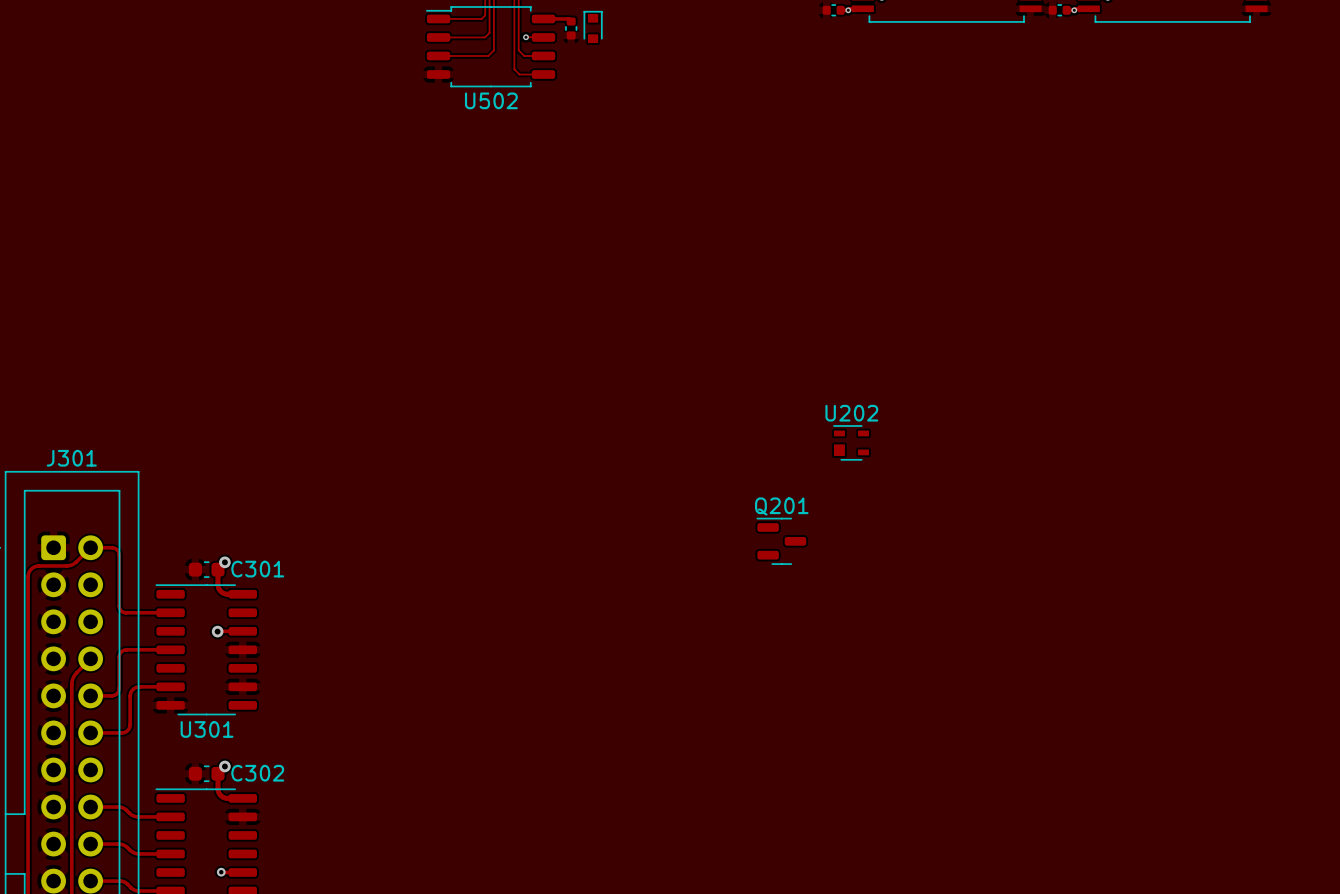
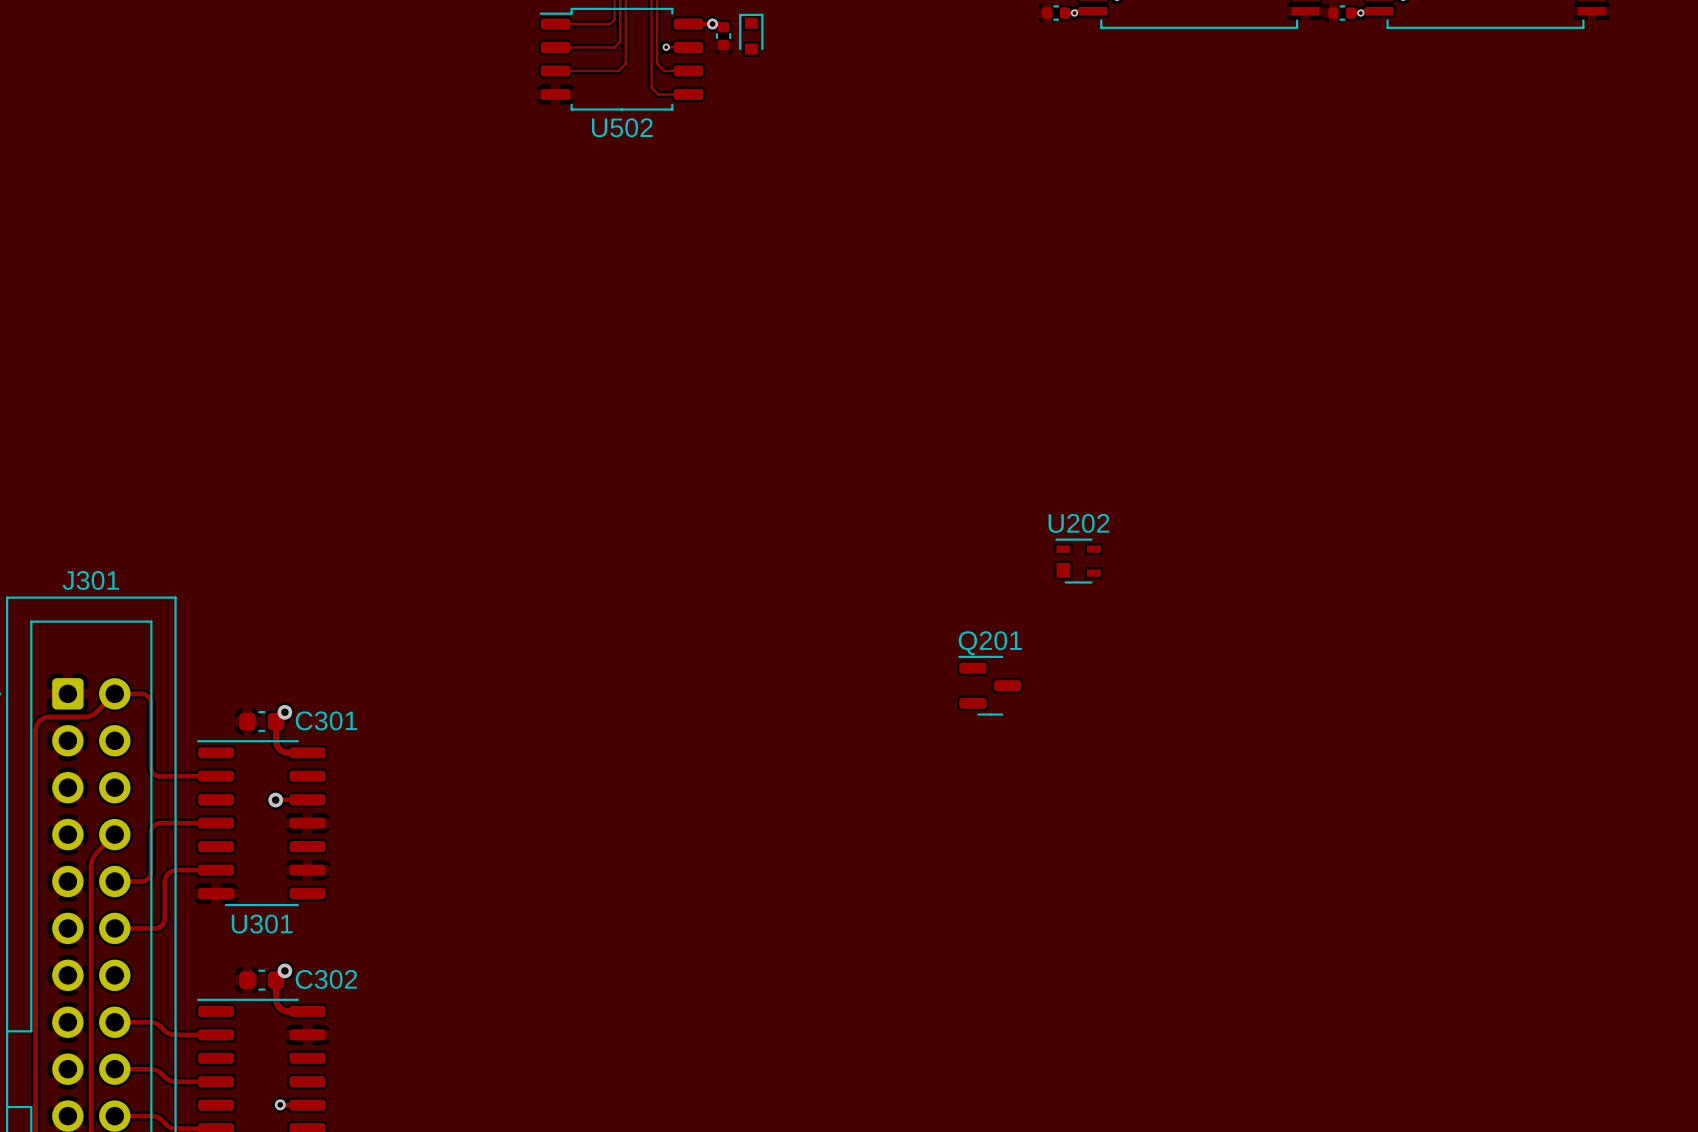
via: none -> (712, 24)

